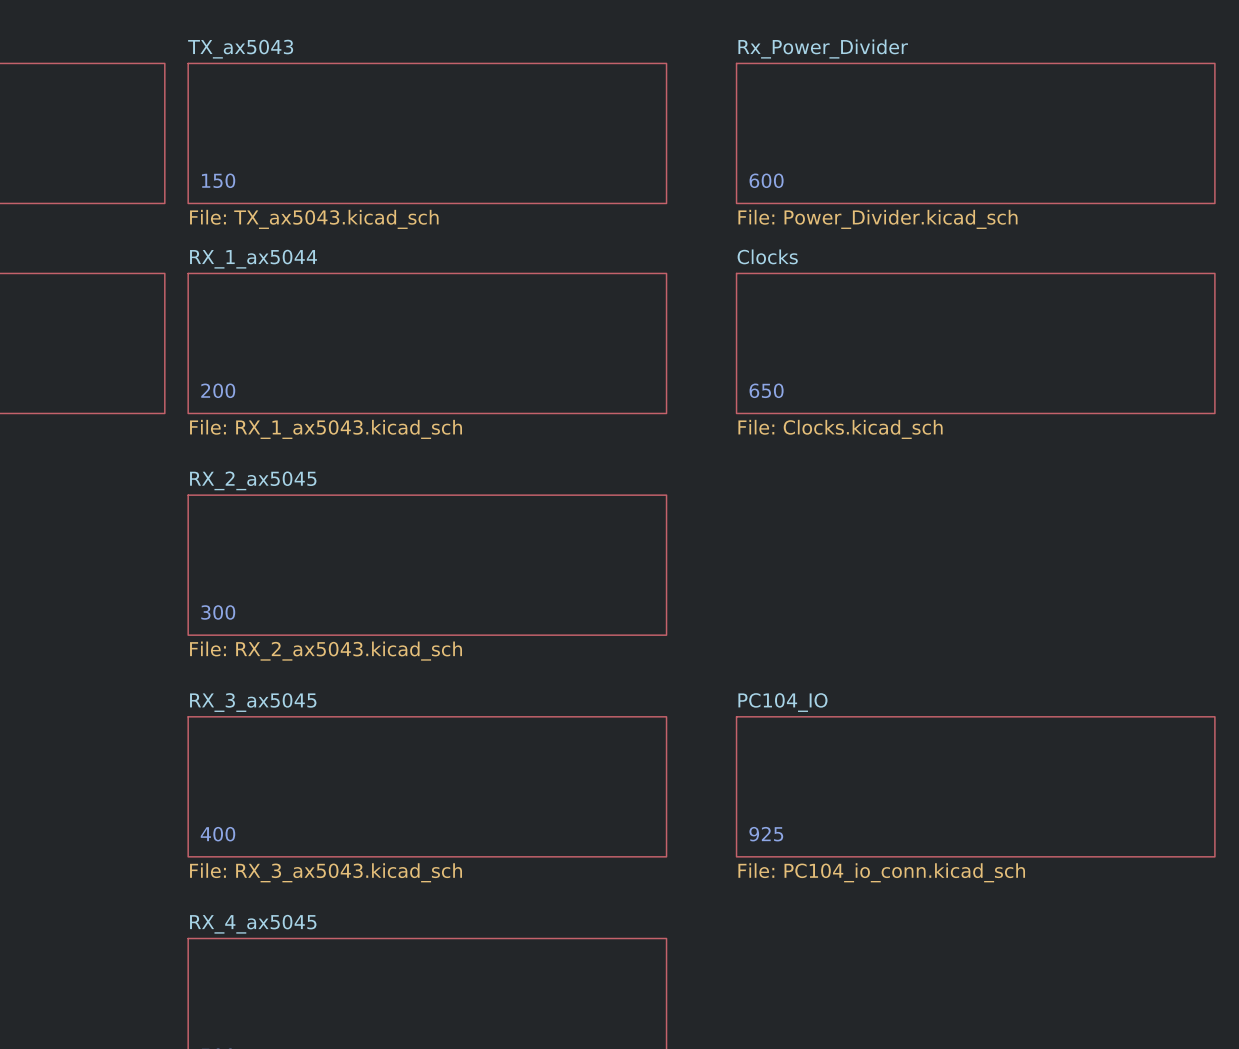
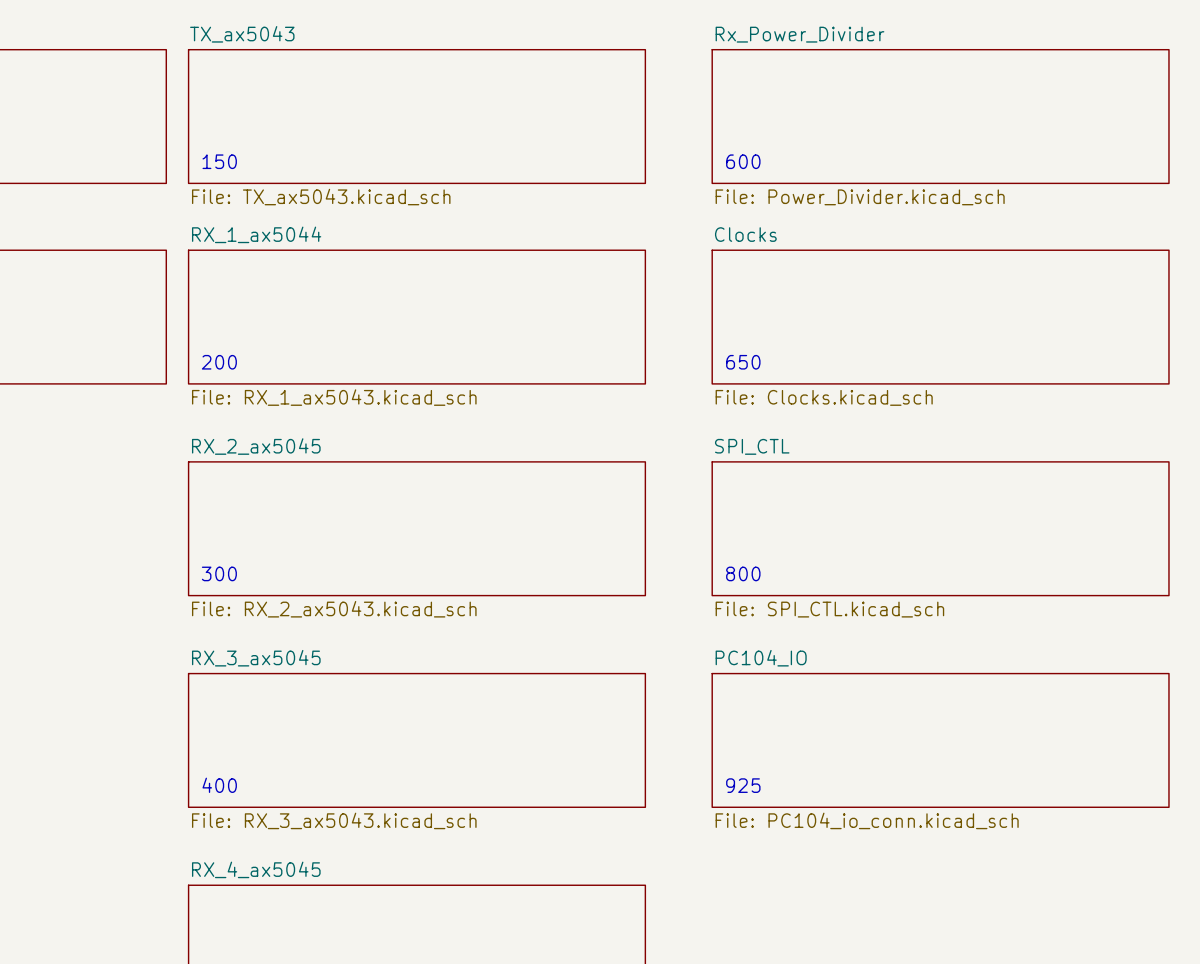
sheet SPI_CTL: none -> File: SPI_CTL.kicad_sch (940, 528)
text: none -> 800 (743, 573)

